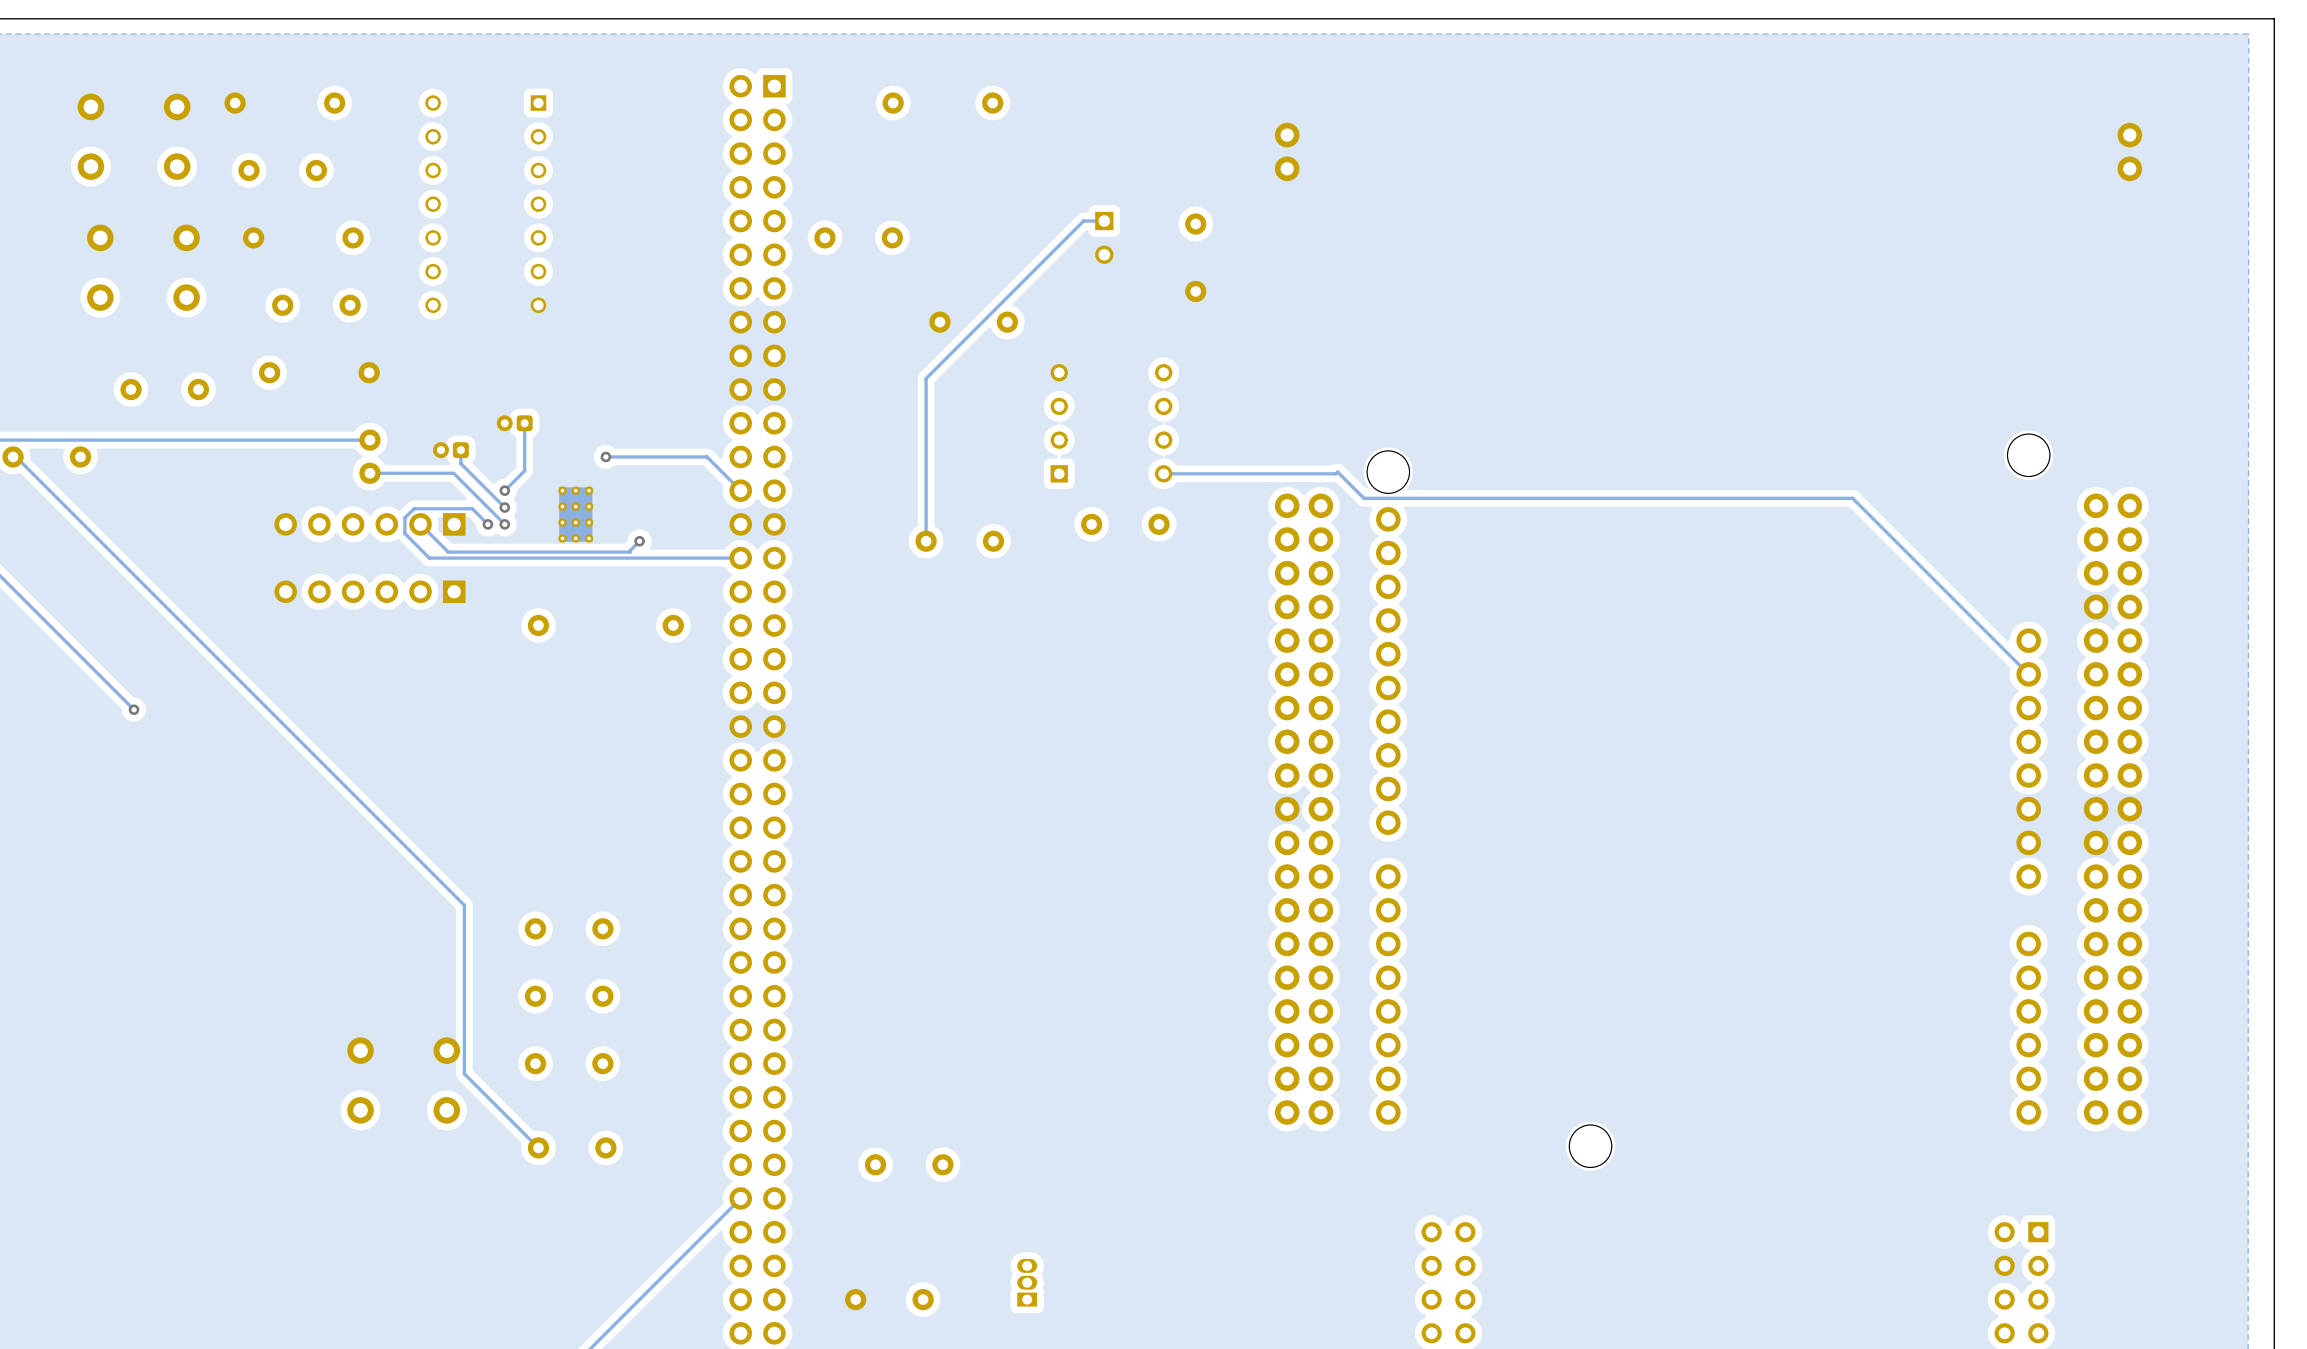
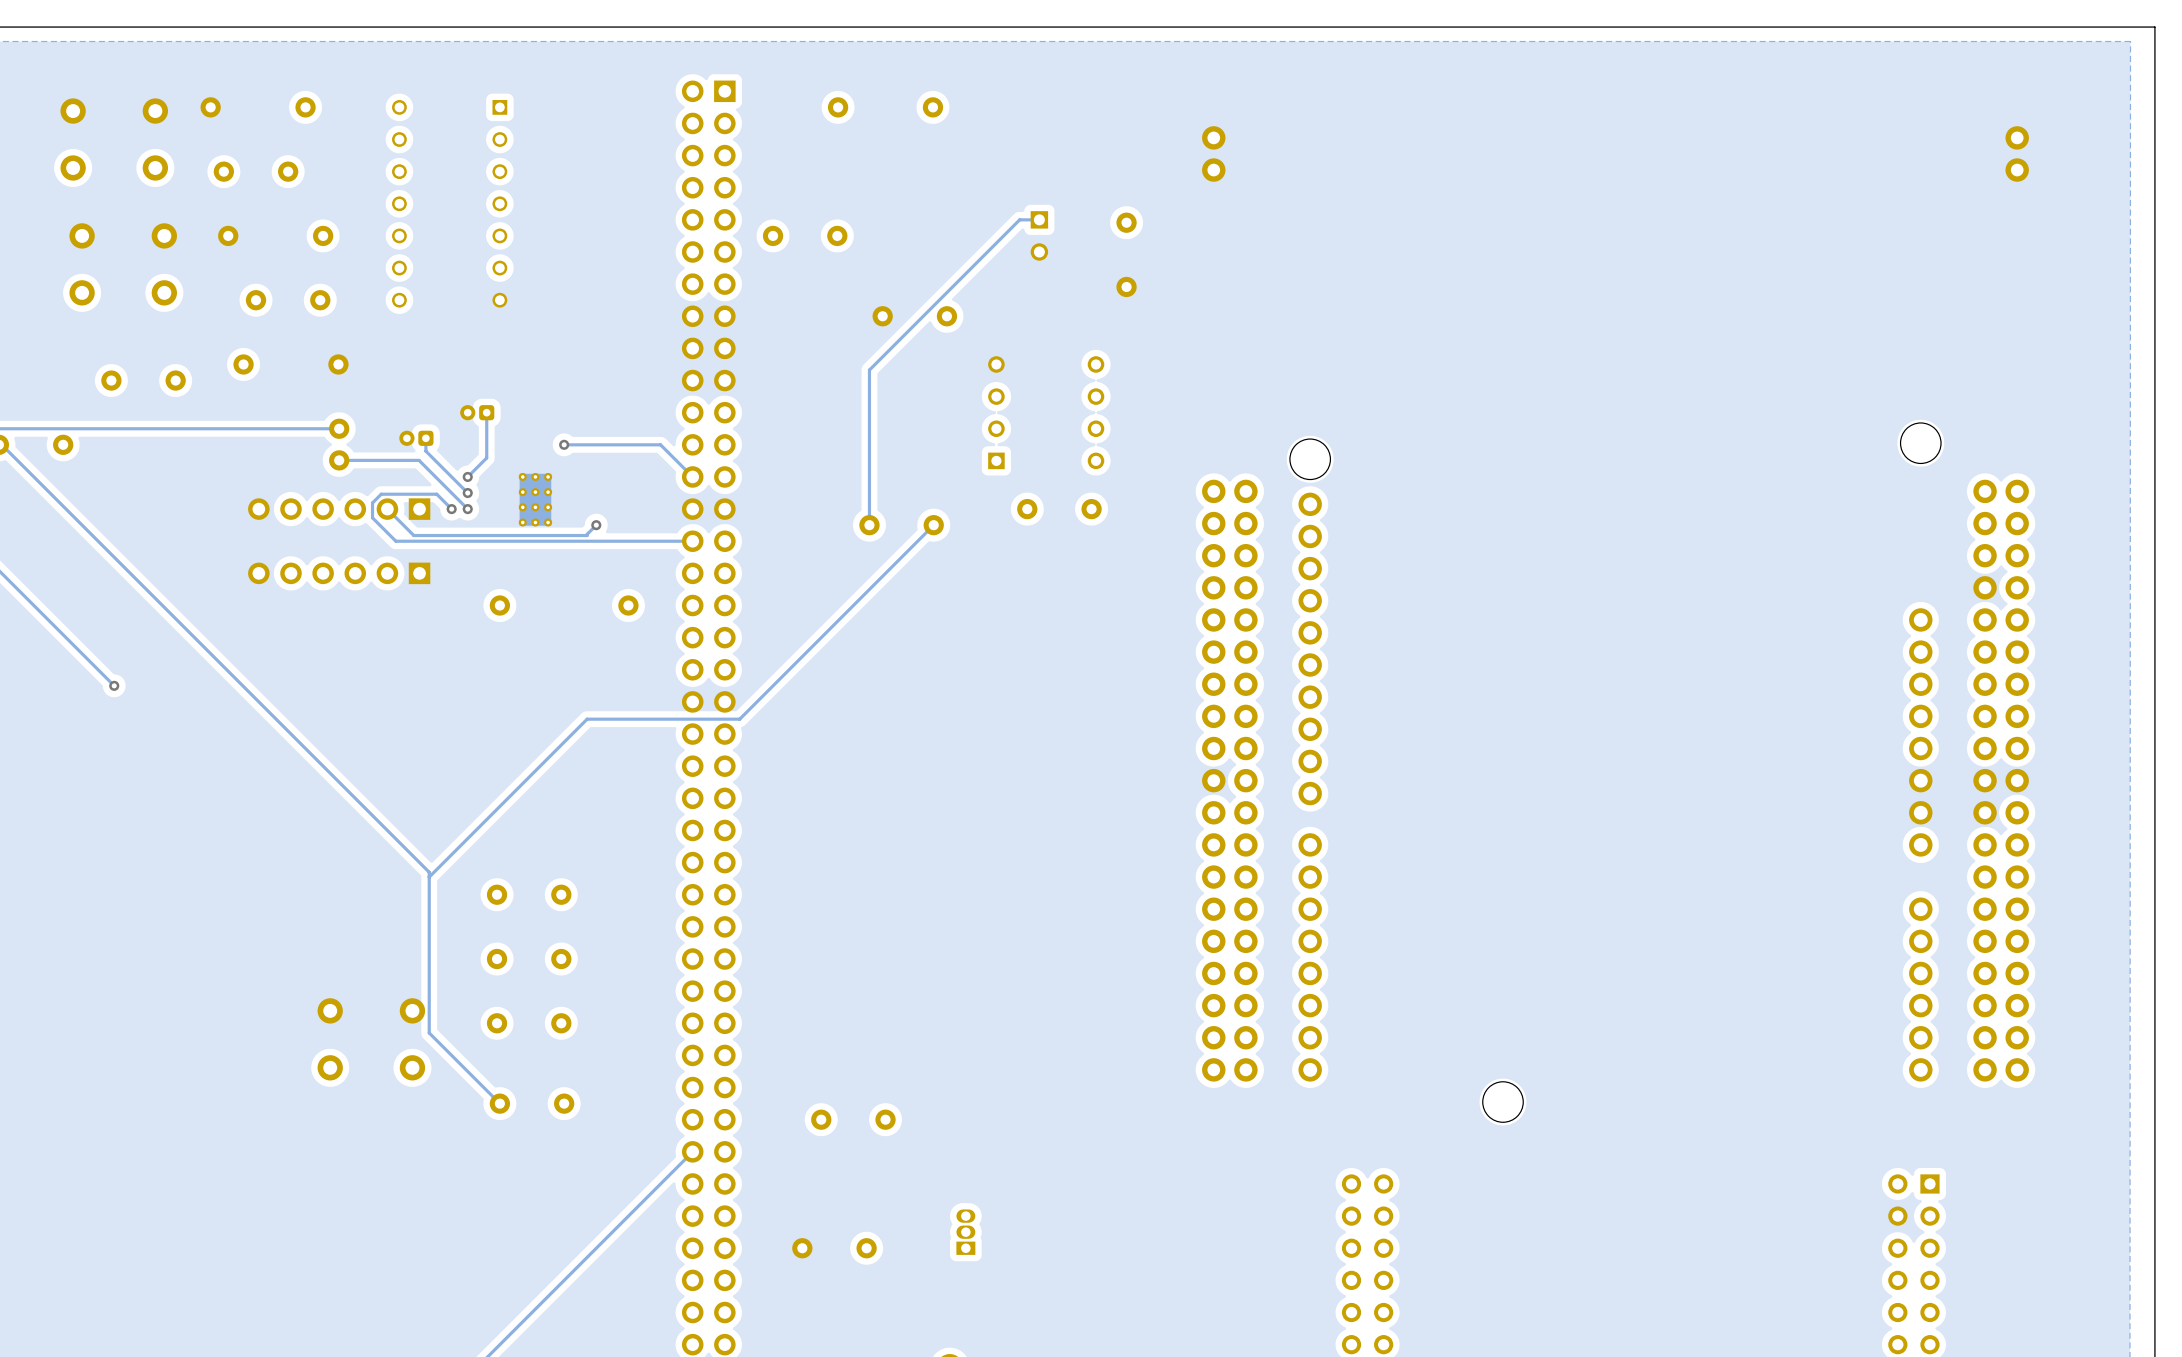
track: (1163, 473) (1336, 473) (1337, 472) (1363, 498) (1852, 498) (2028, 674) -> none
track: none -> (933, 525) (739, 719) (587, 719) (429, 877)

